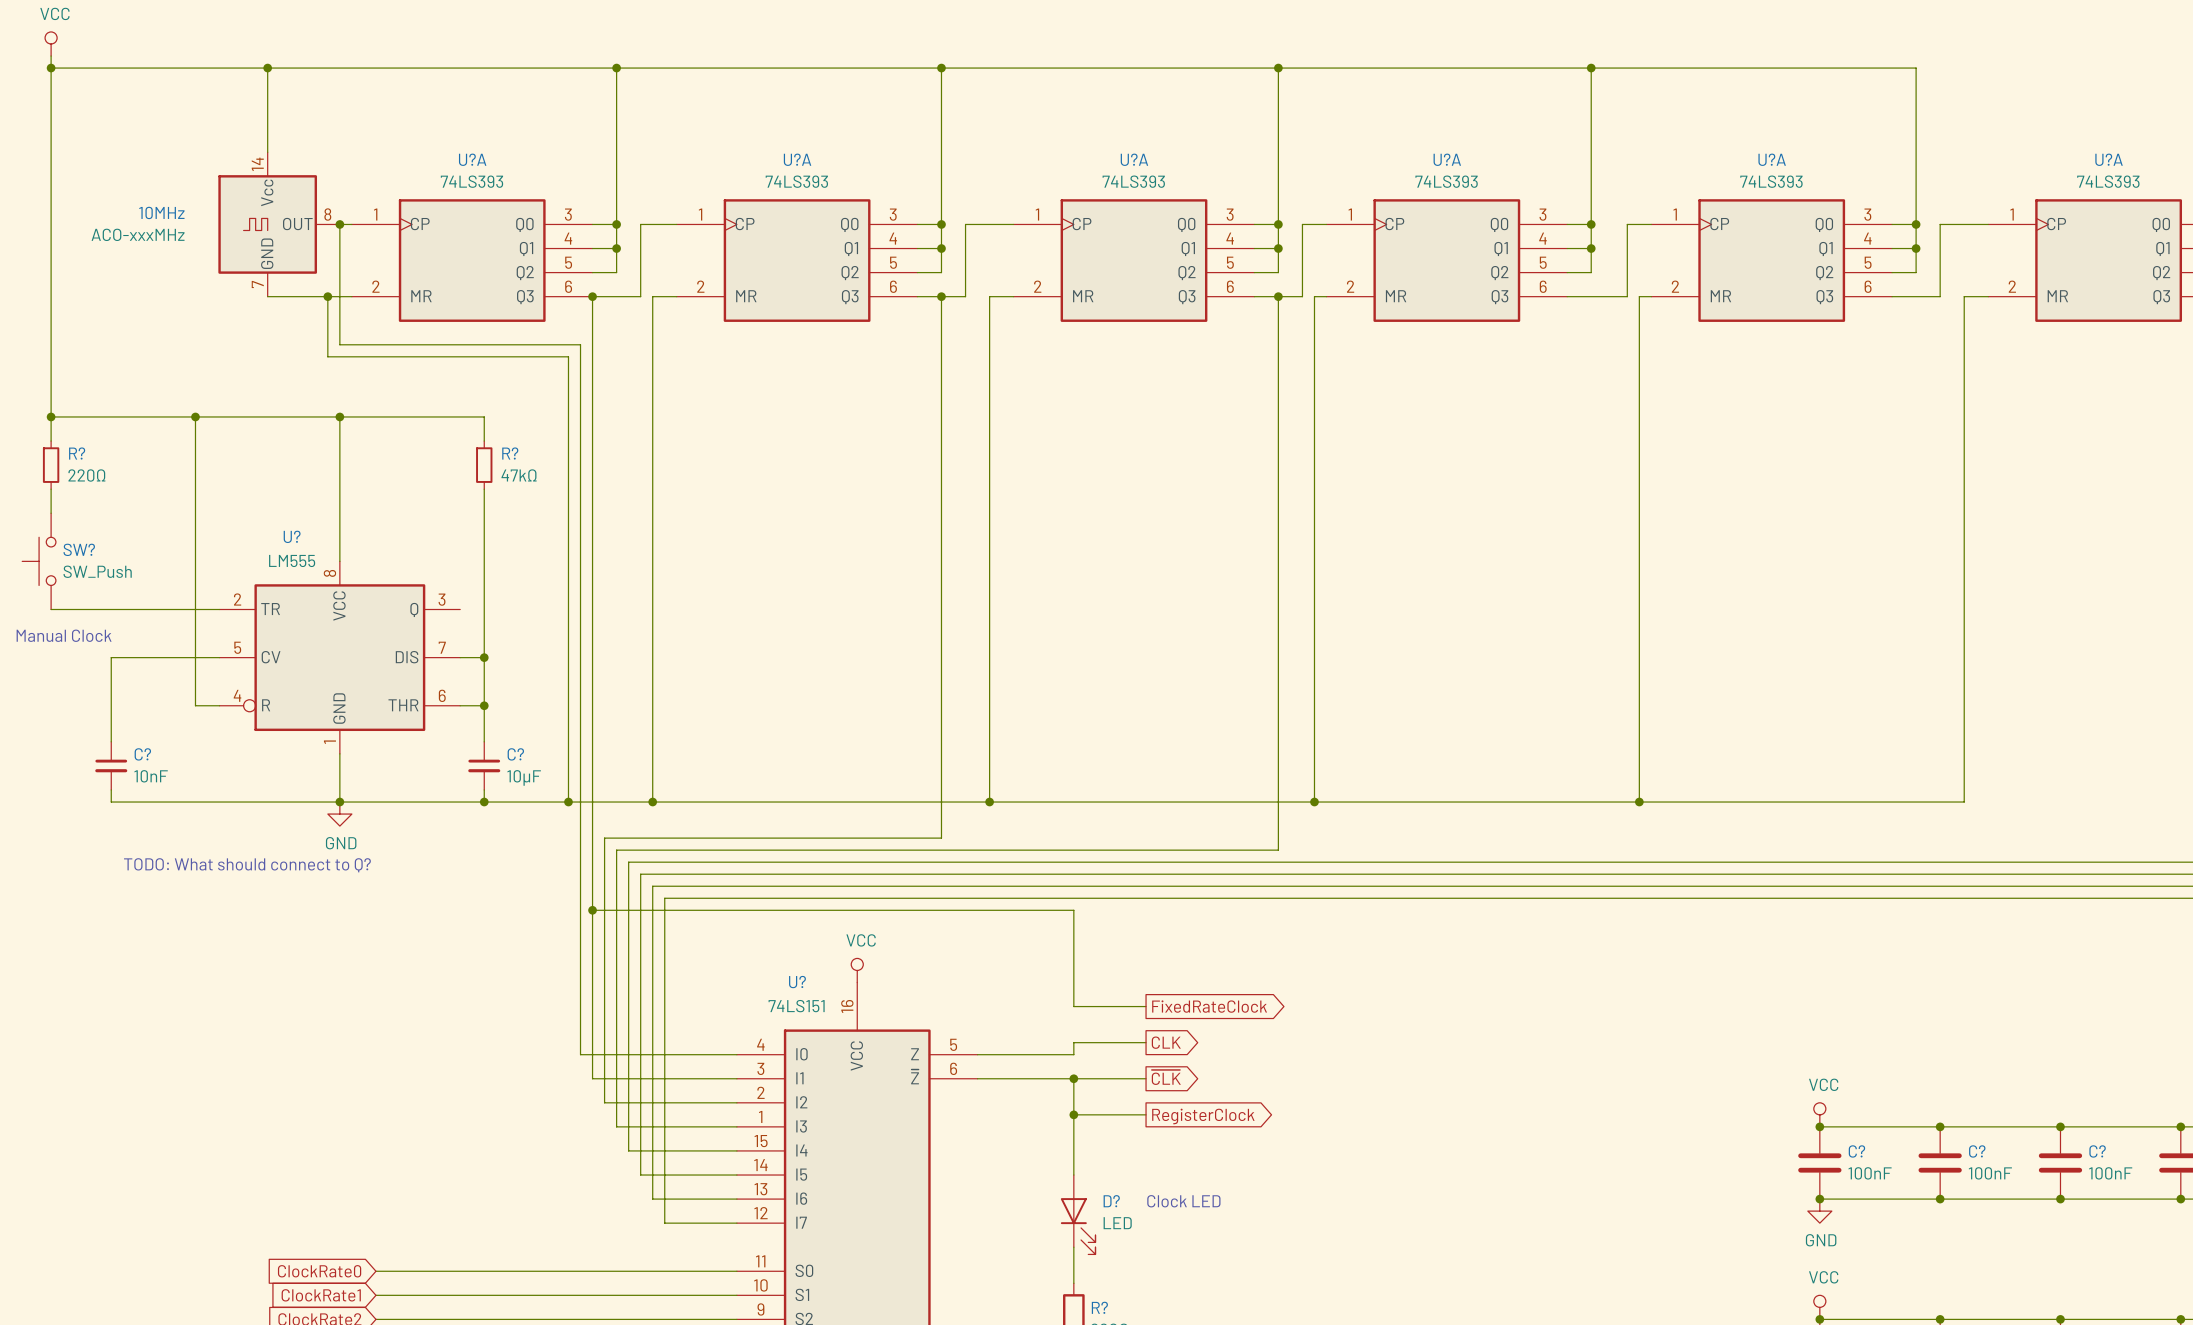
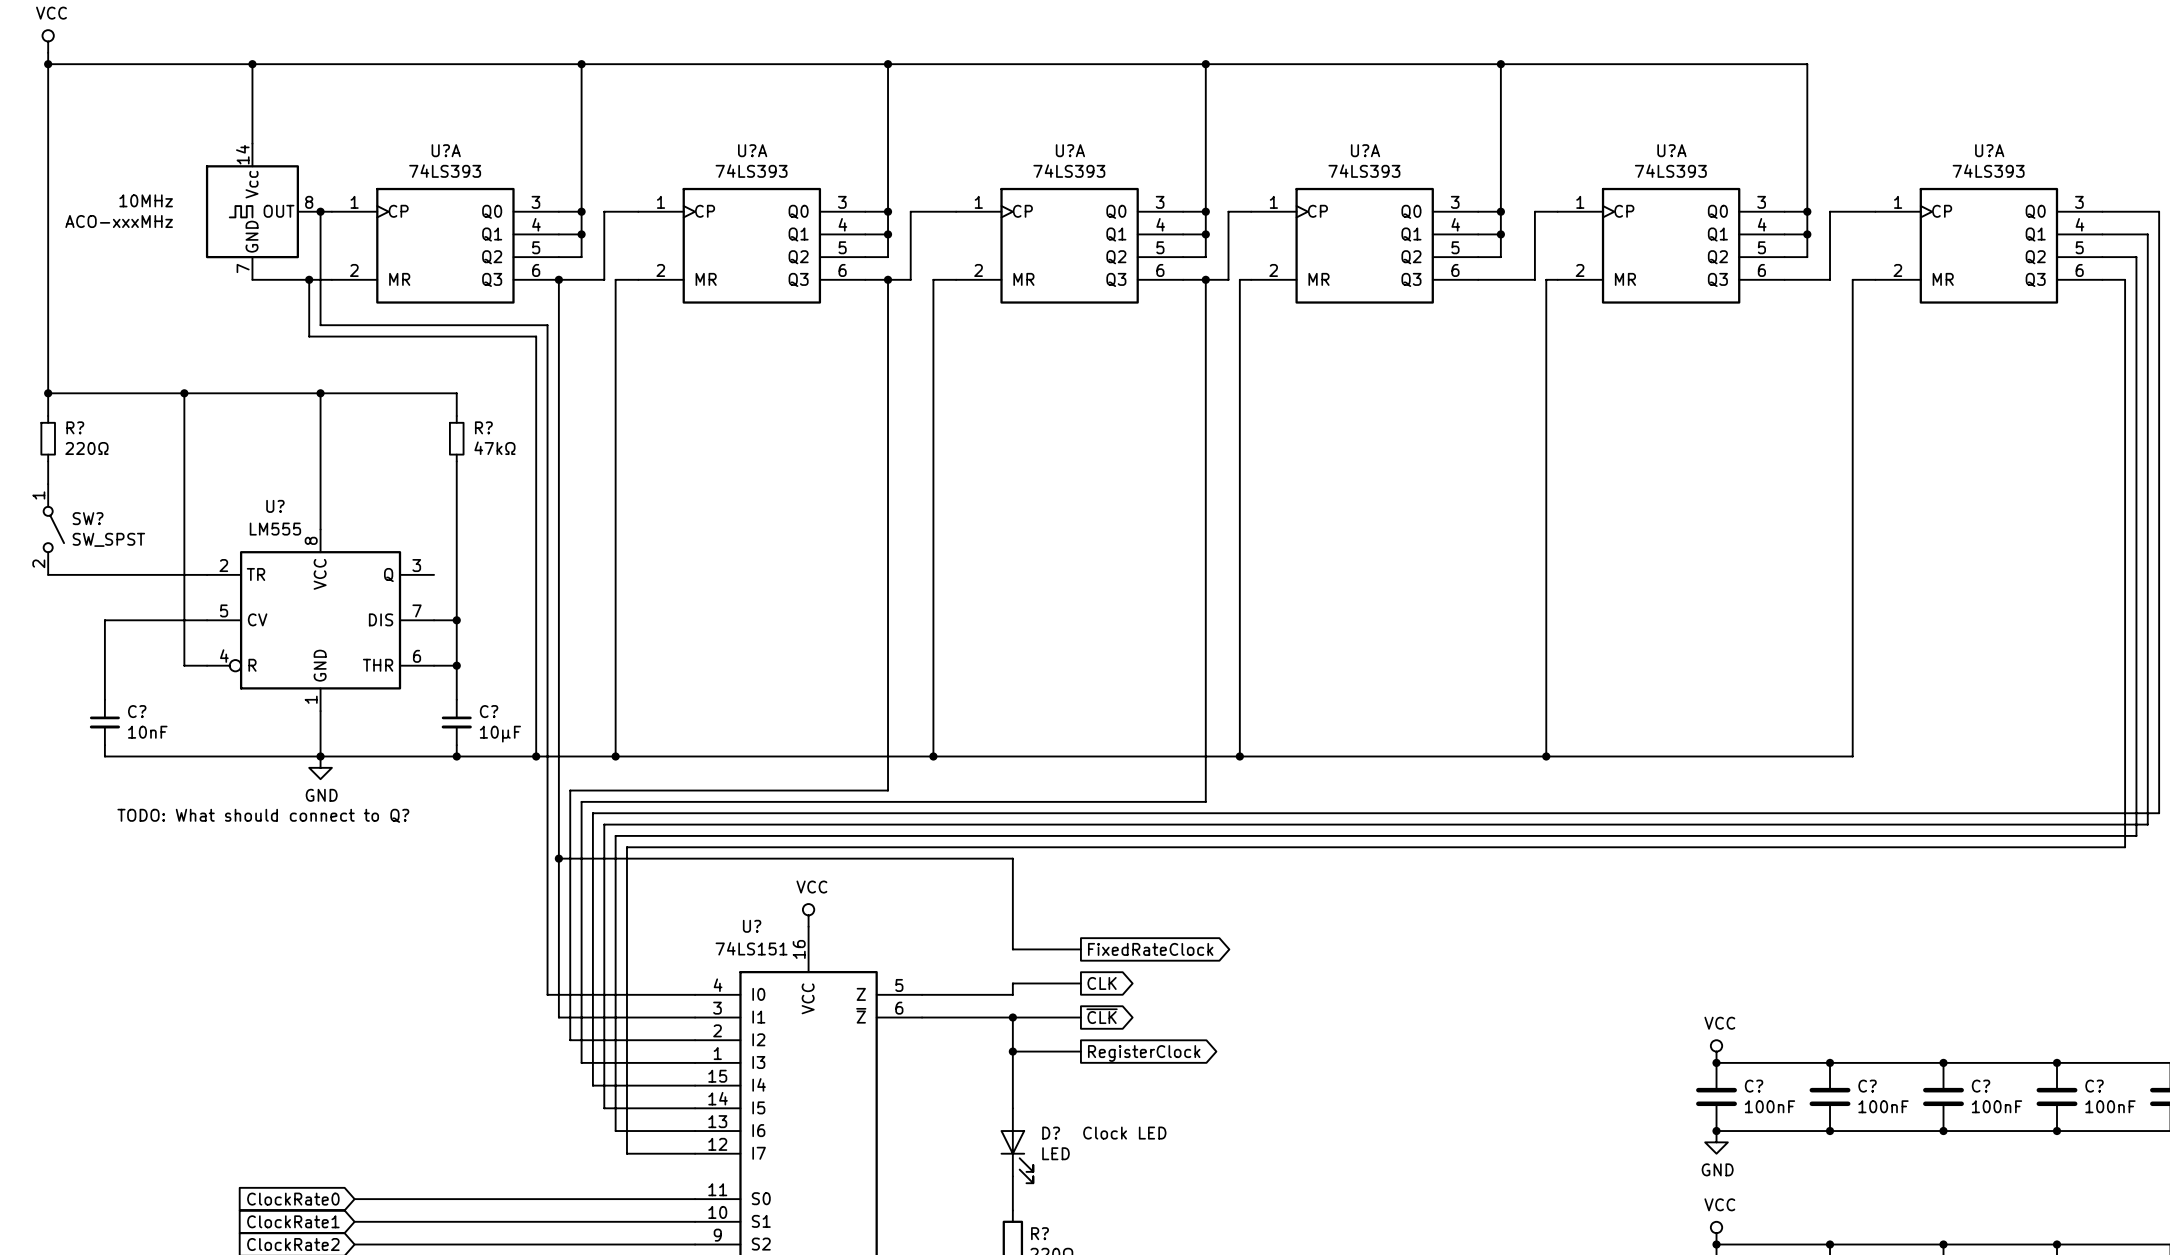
SW?: SW_Push (39, 561) -> none
SW?: none -> SW_SPST (53, 529)
text: Manual Clock (64, 635) -> none

